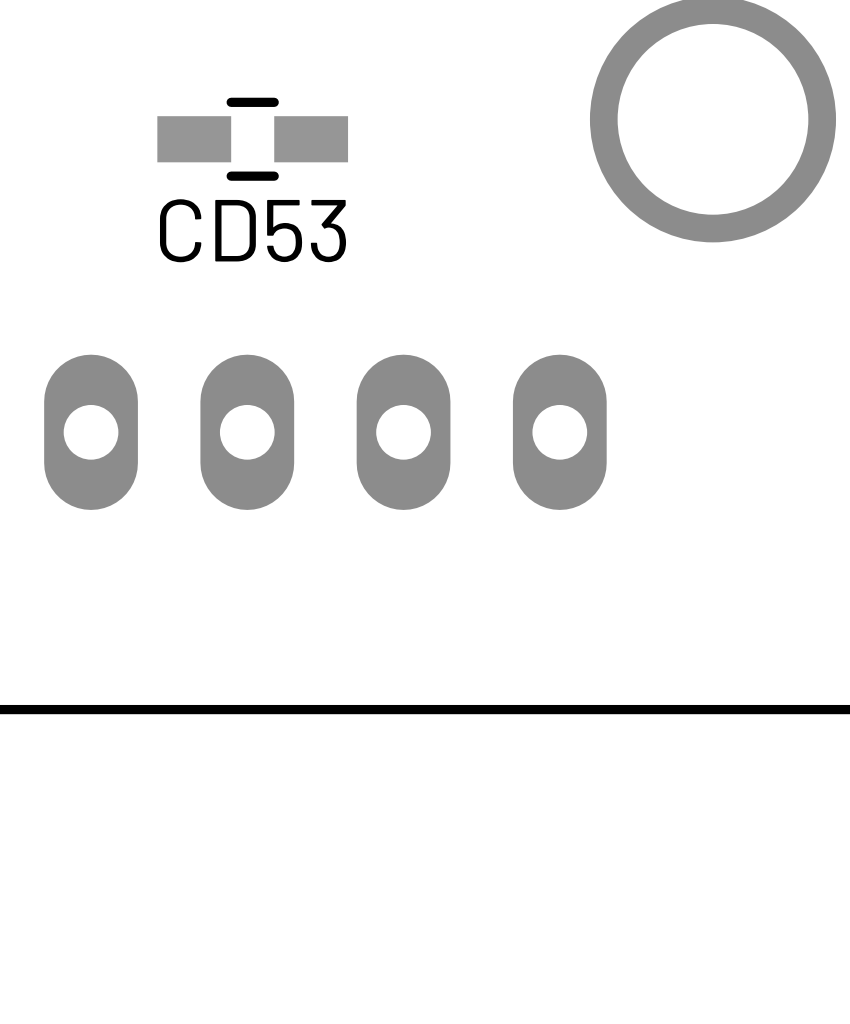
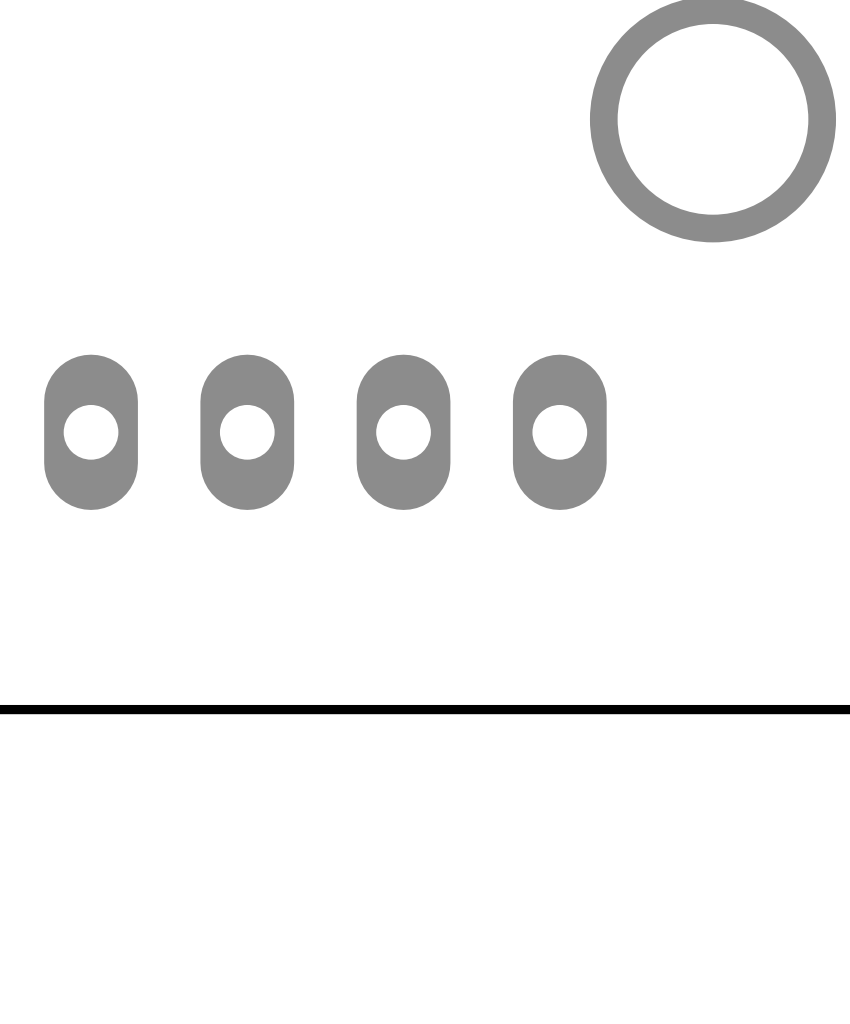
CD53: (252, 139) -> none

